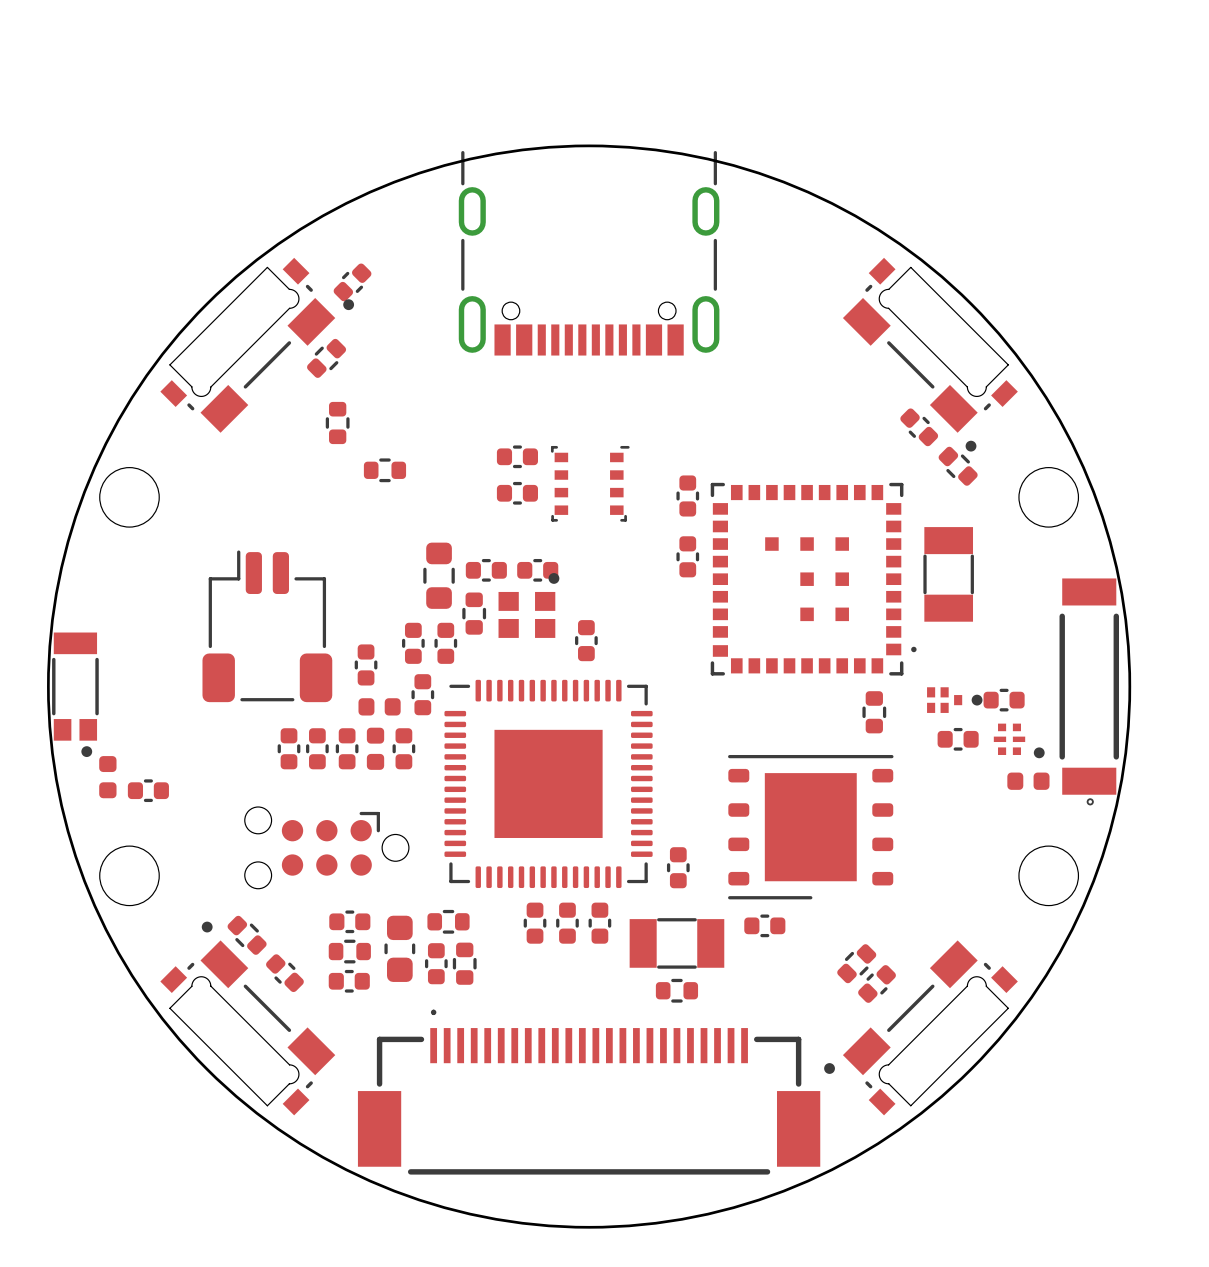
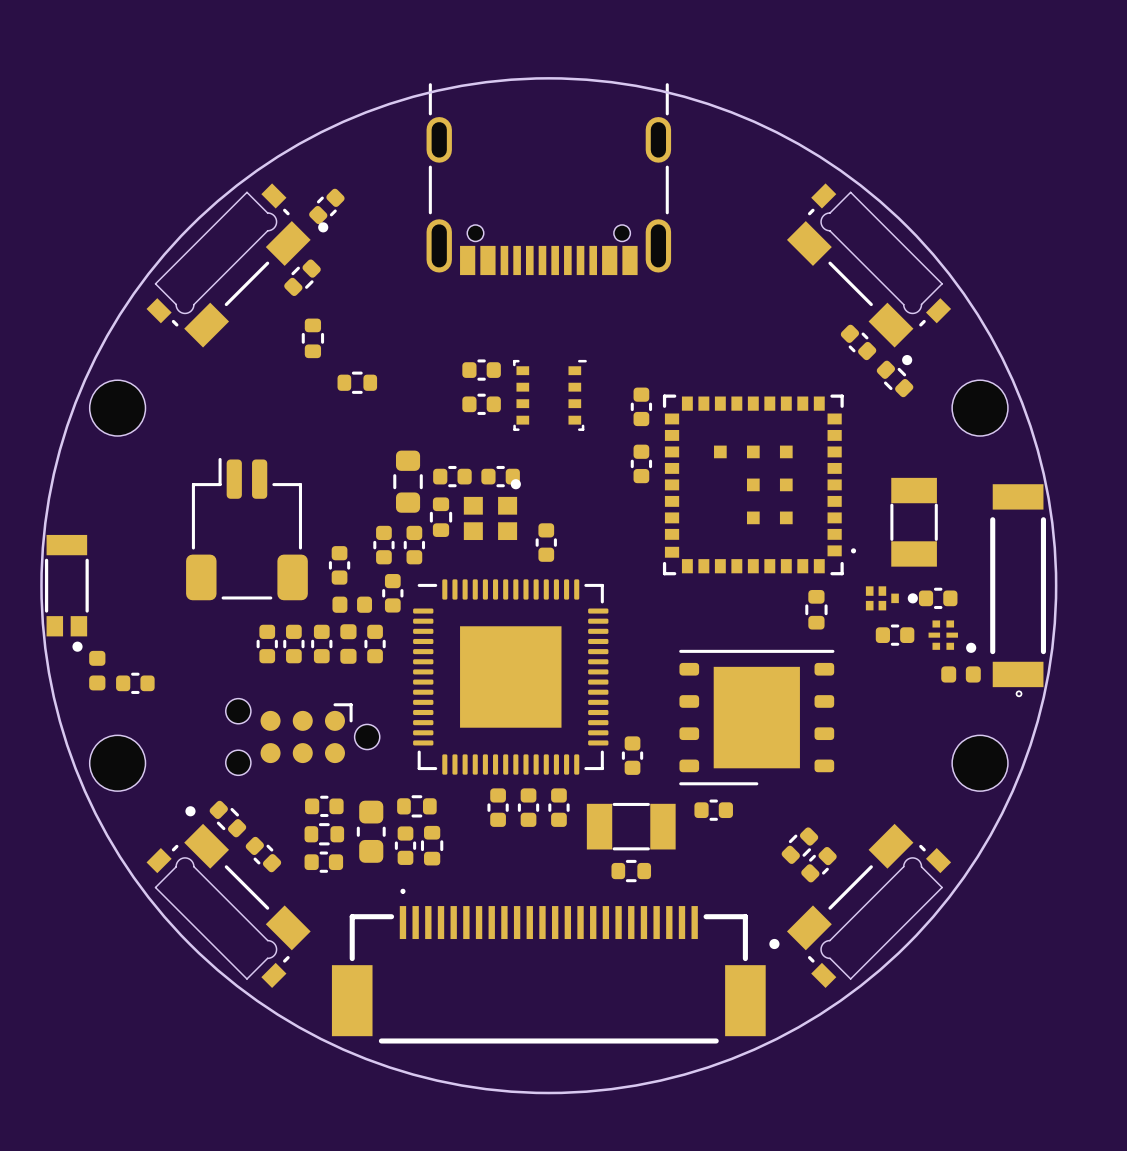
part position: (948, 574) -> (914, 522)

